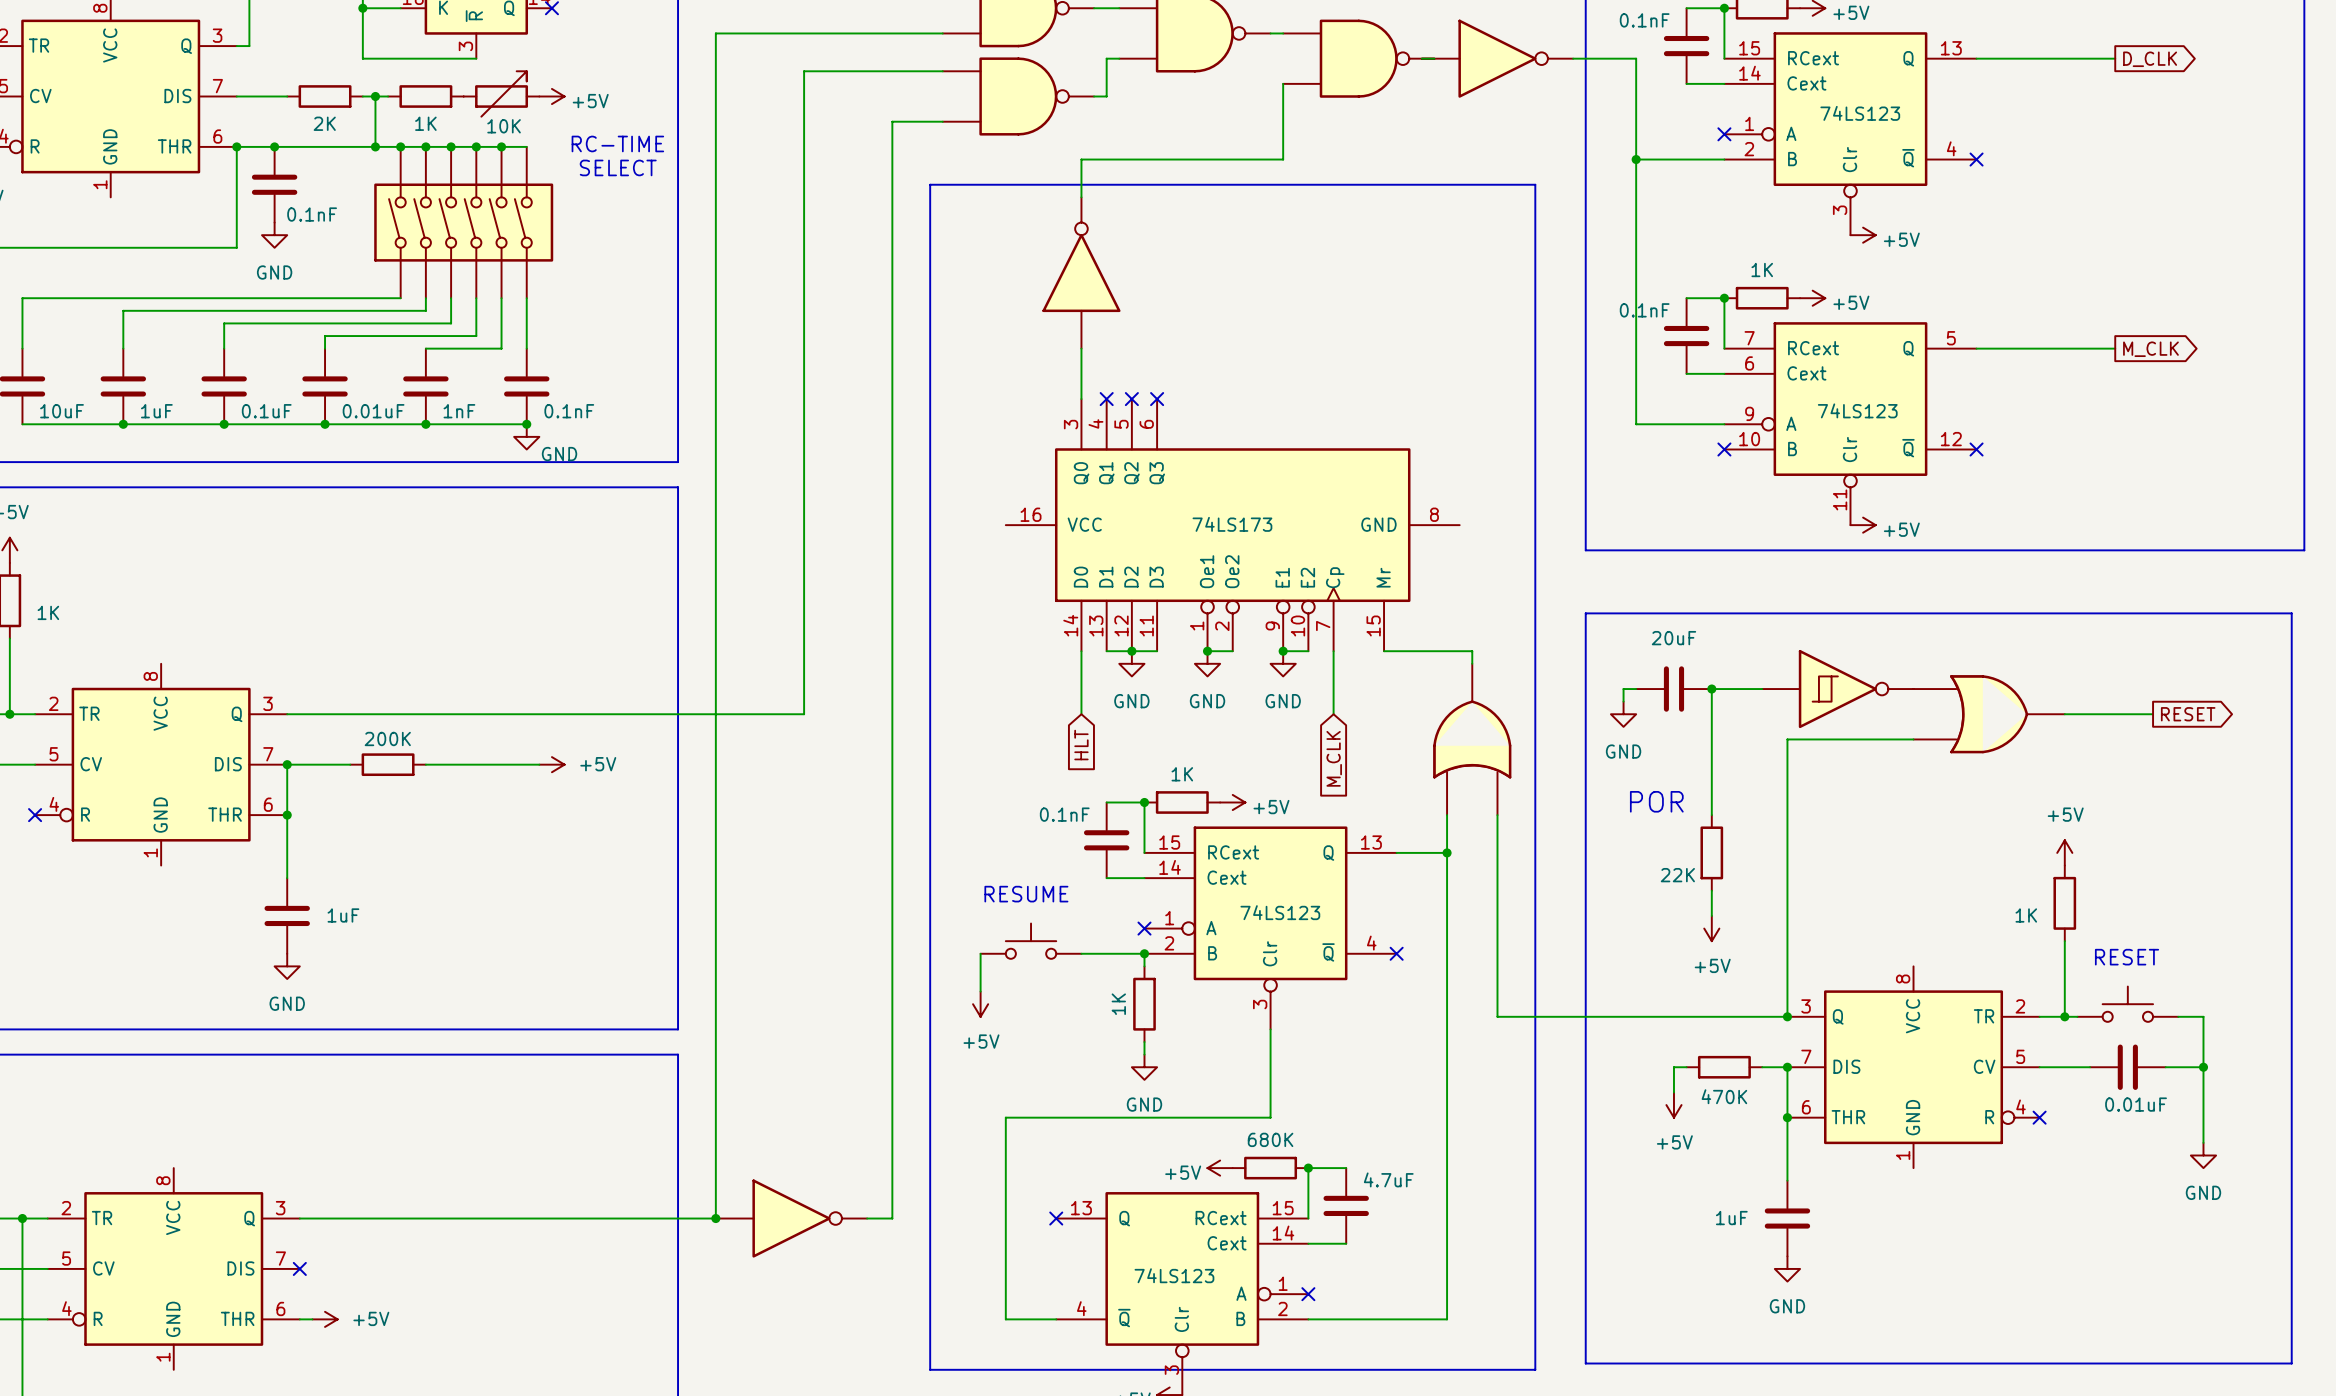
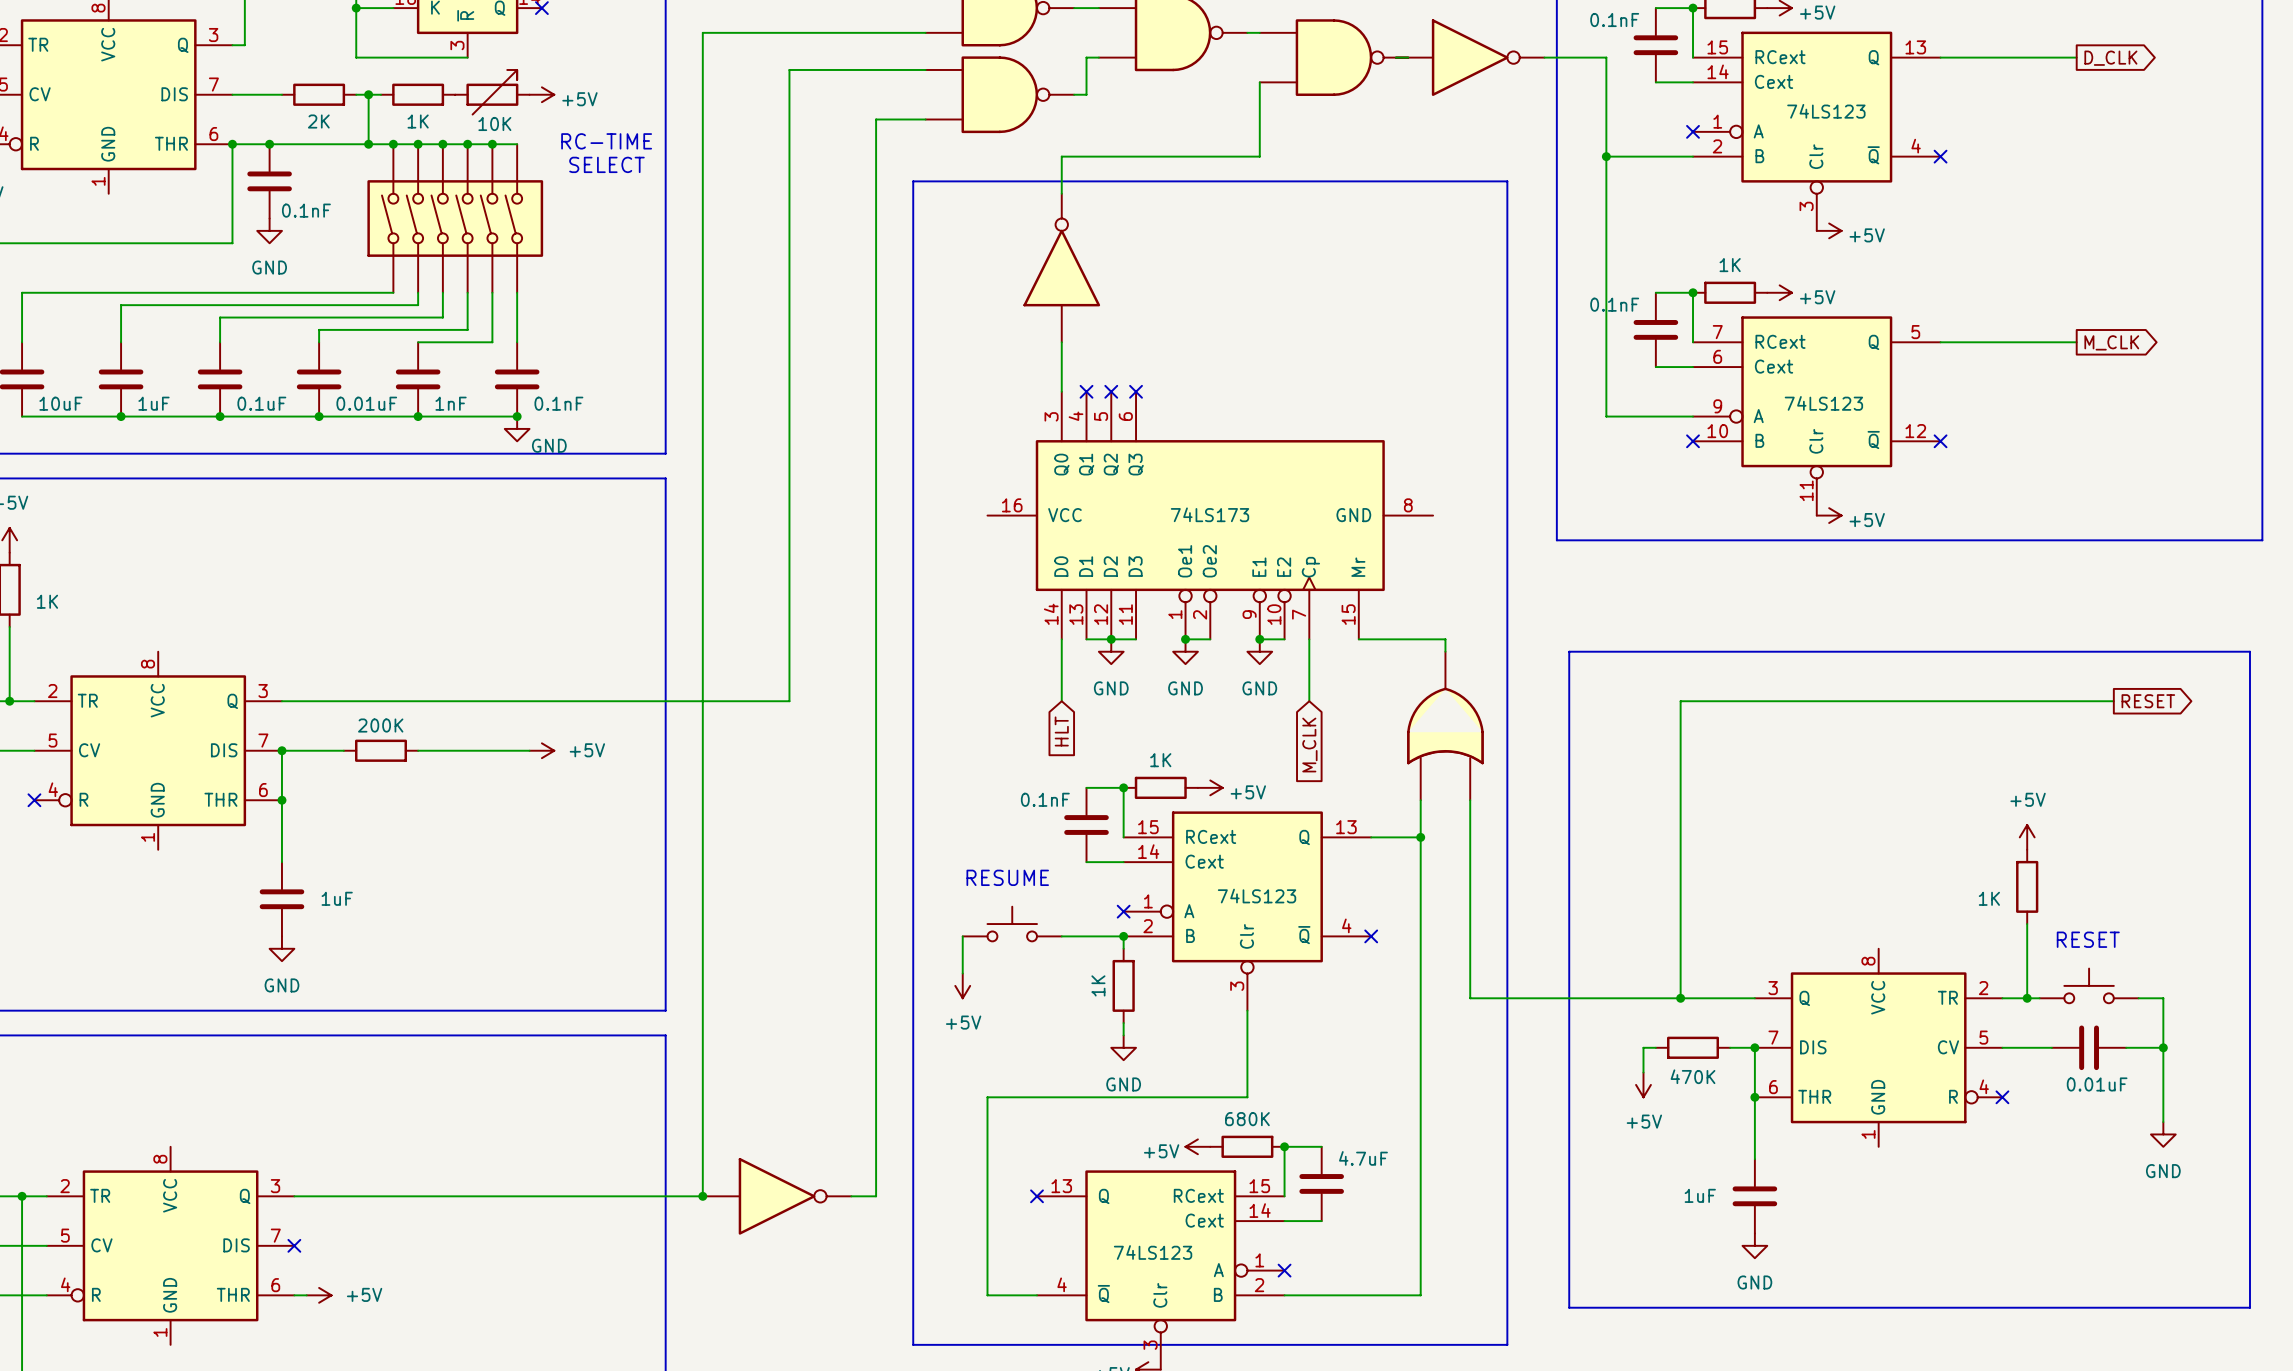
line: (2291, 663) (2291, 613) (1585, 613) (1585, 1363) (2291, 1363) (2291, 1331) -> (2249, 651) (1569, 651) (1569, 1307) (2249, 1307)
wire: (1636, 689) (1623, 689) (1623, 701) -> none
part: 20uF (1673, 689) -> none
junction: (1711, 689) -> none
wire: (1762, 689) (1711, 689) (1711, 714) -> (2027, 701) (1680, 701)
part: (1837, 689) -> none
power symbol: GND (1623, 714) -> none
part: (1989, 714) -> none
wire: (1913, 739) (1787, 739) (1787, 1016) -> none
text: POR (1656, 801) -> none
wire: none -> (1680, 800) (1680, 874)
part: 22K (1711, 852) -> none
wire: none -> (1680, 899) (1680, 998)
power symbol: +5V (1711, 928) -> none
junction: none -> (1680, 998)
junction: (1787, 1016) -> none

